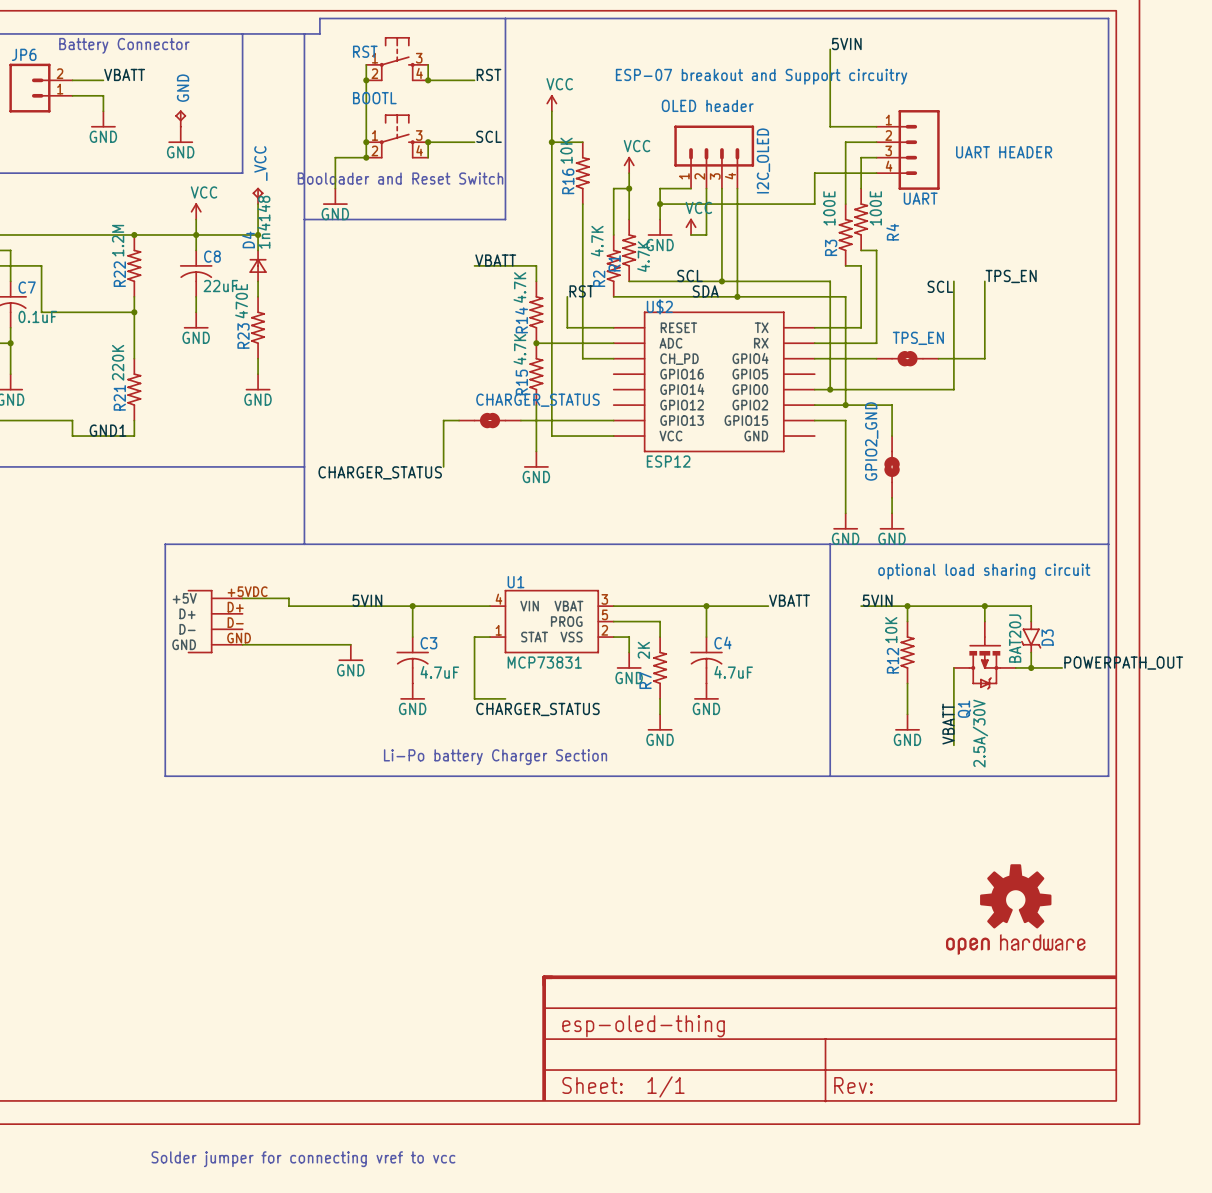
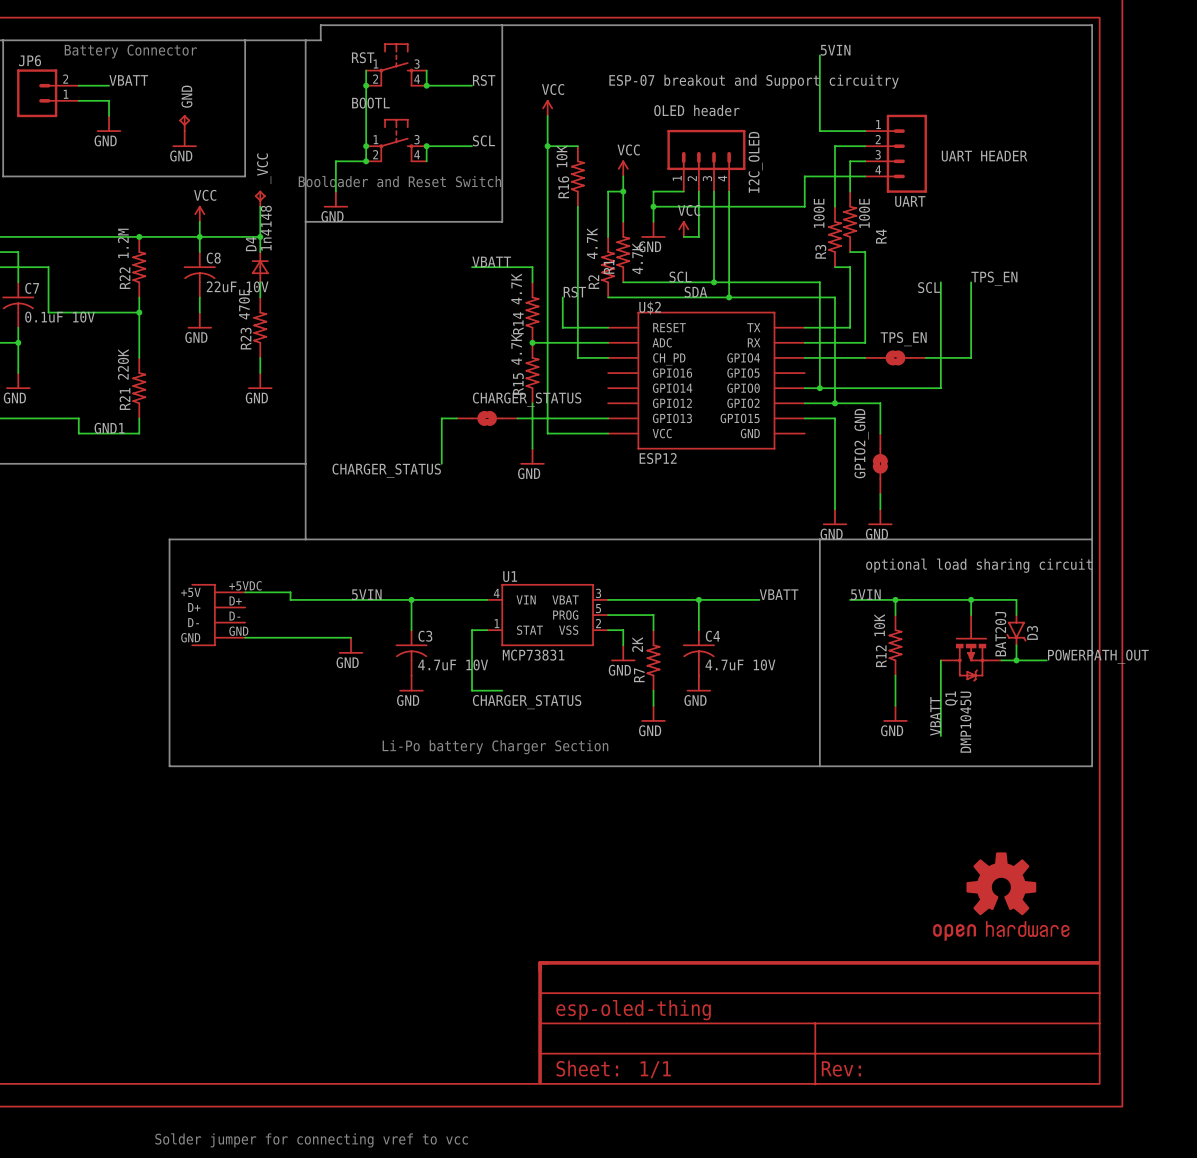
C8 value: 22uF (220, 286) -> 22uF 10V (237, 286)
C7 value: 0.1uF (37, 316) -> 0.1uF 10V (59, 317)
C3 value: 4.7uF (439, 672) -> 4.7uF 10V (453, 664)
C4 value: 4.7uF (733, 672) -> 4.7uF 10V (740, 664)
Q1 value: 2.5A/30V (980, 733) -> DMP1045U (965, 722)

